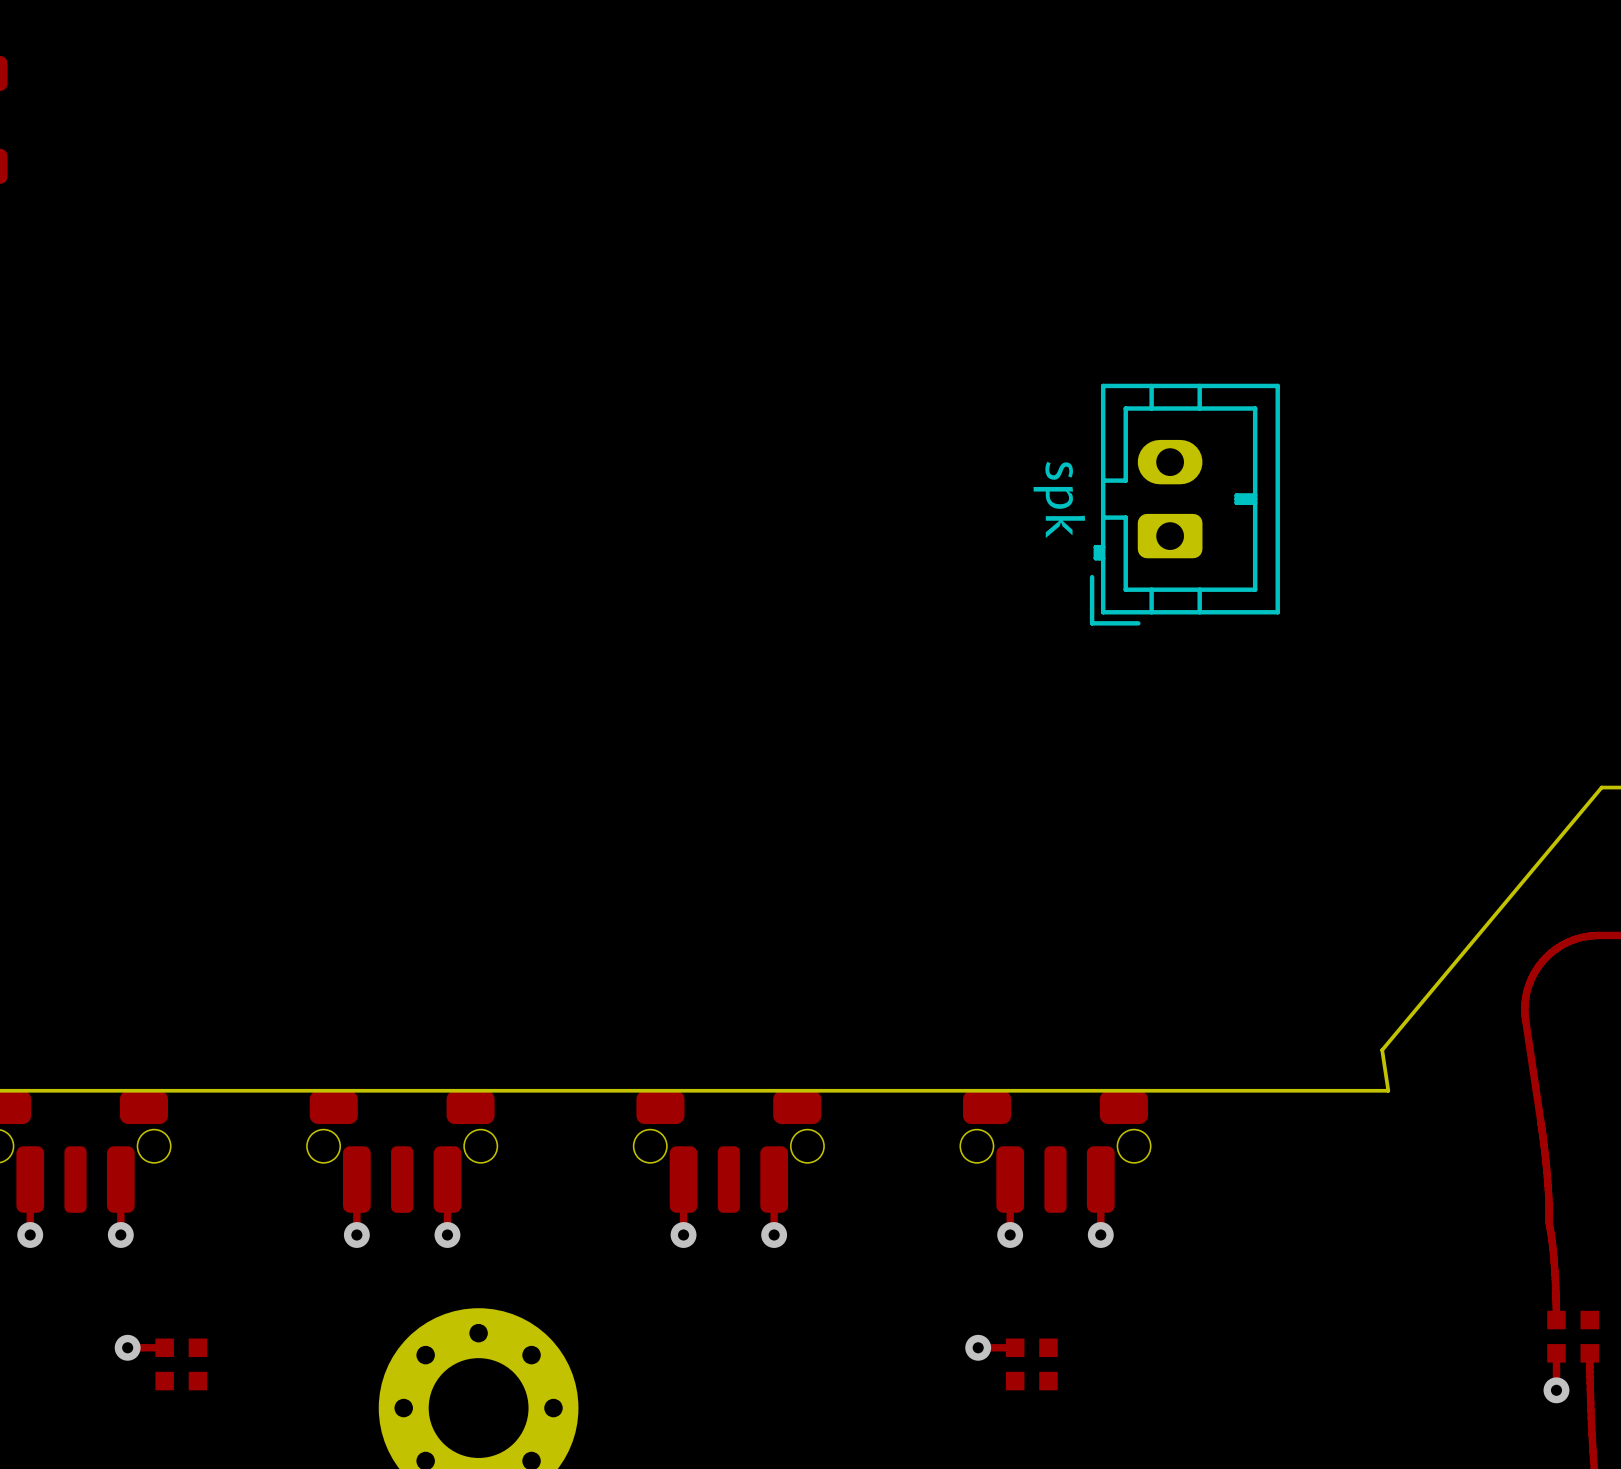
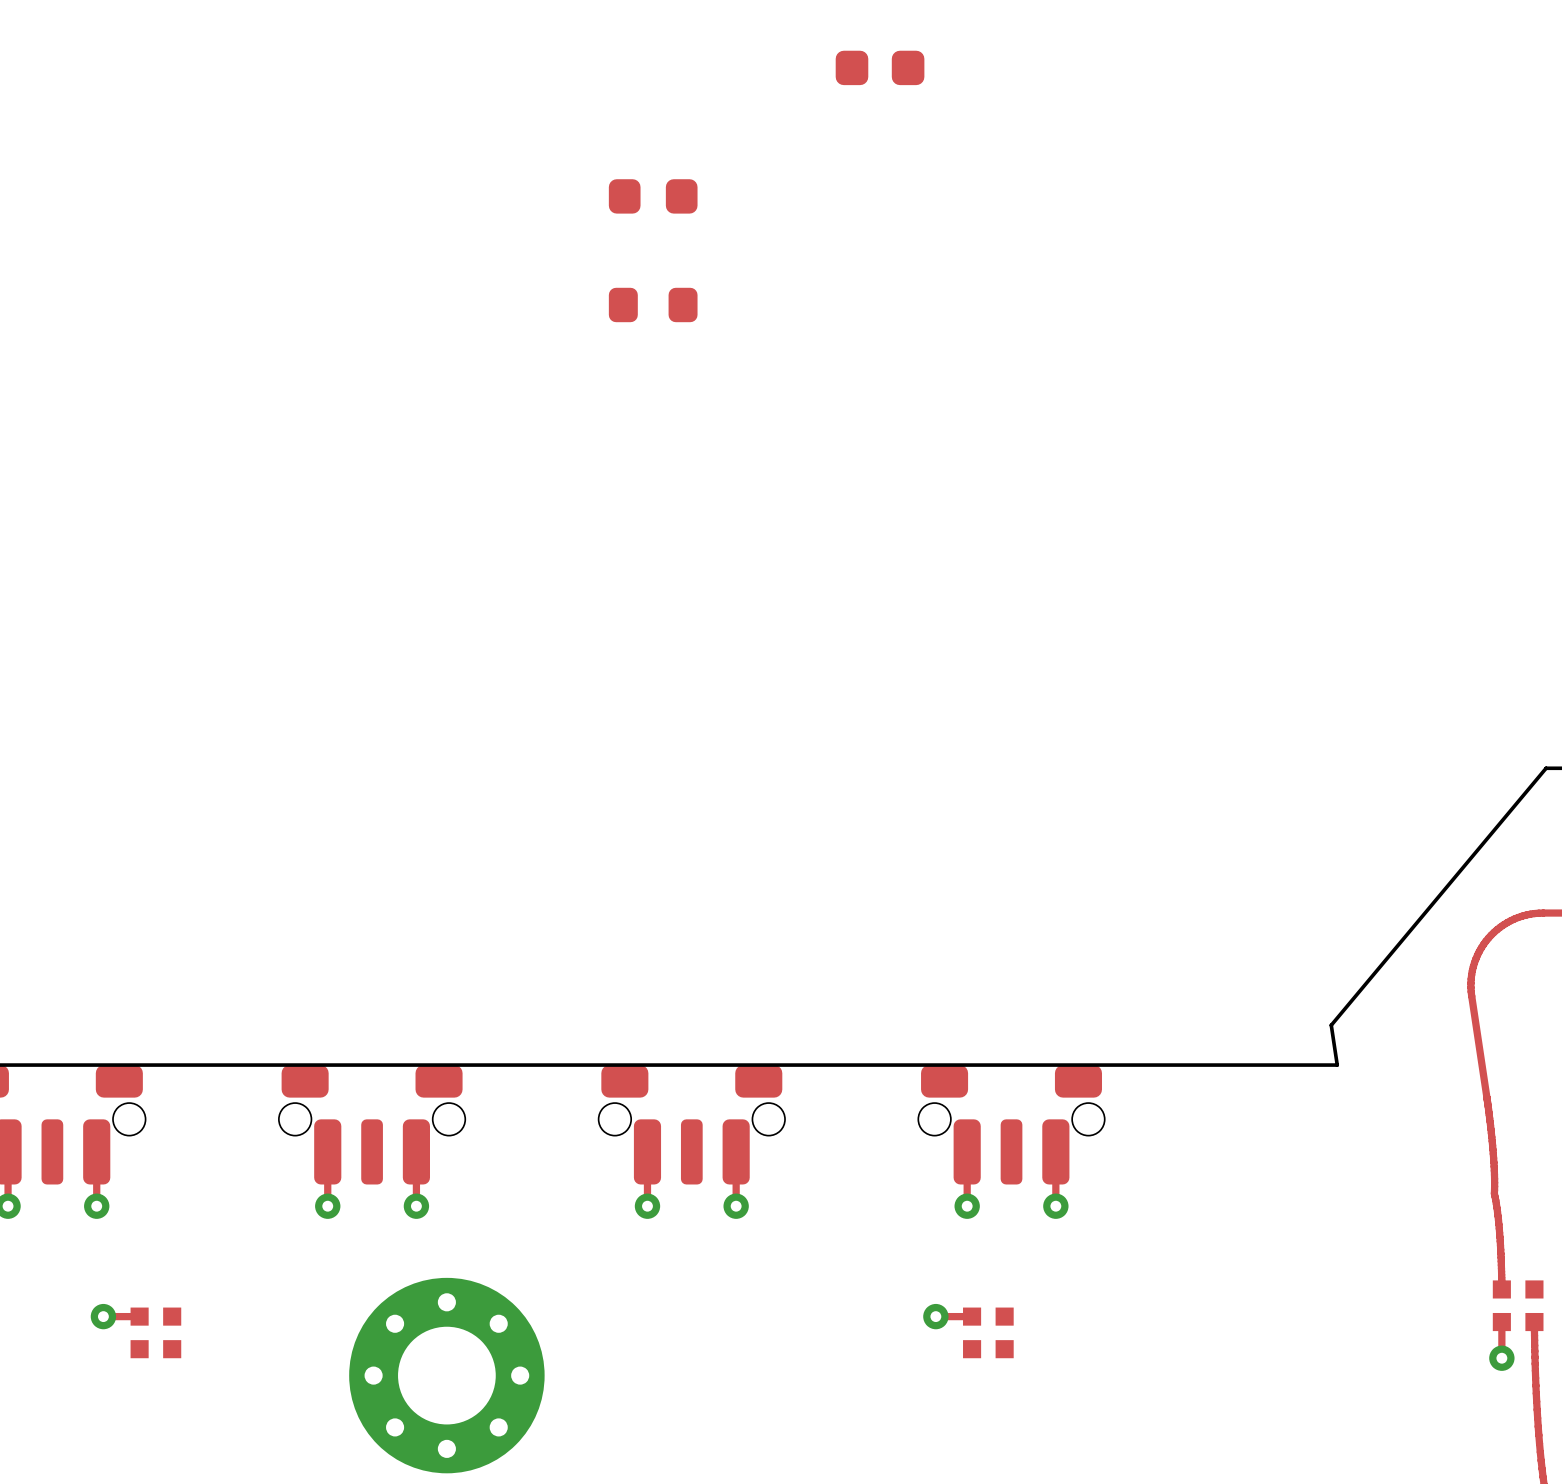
part: none -> (880, 67)
part: none -> (653, 196)
part: none -> (653, 304)
spk: (1184, 504) -> none

